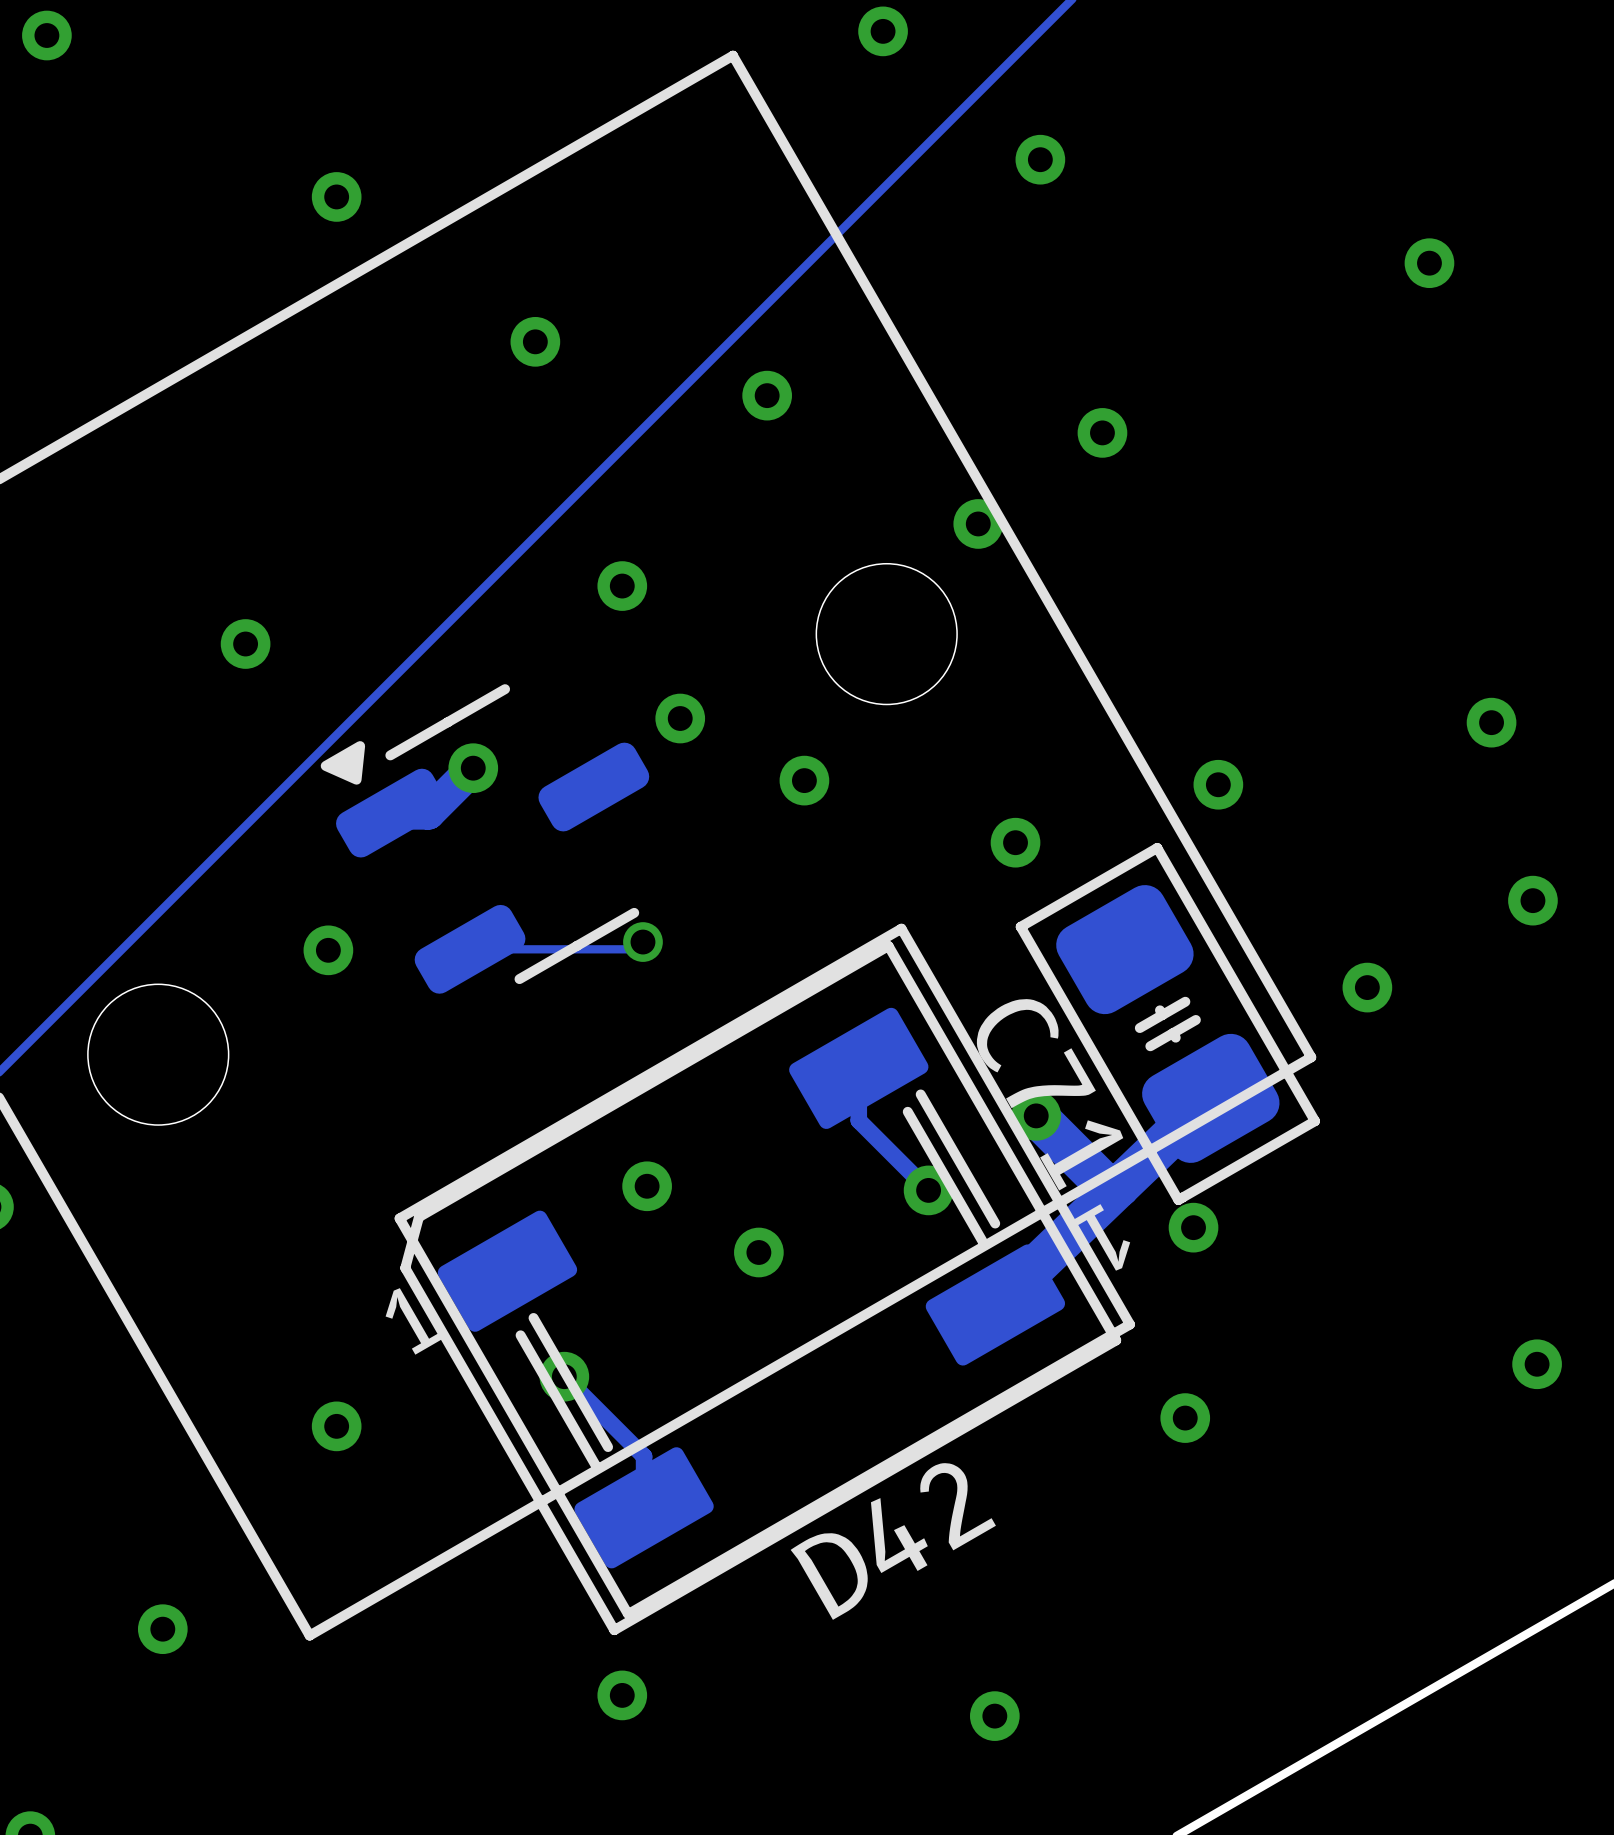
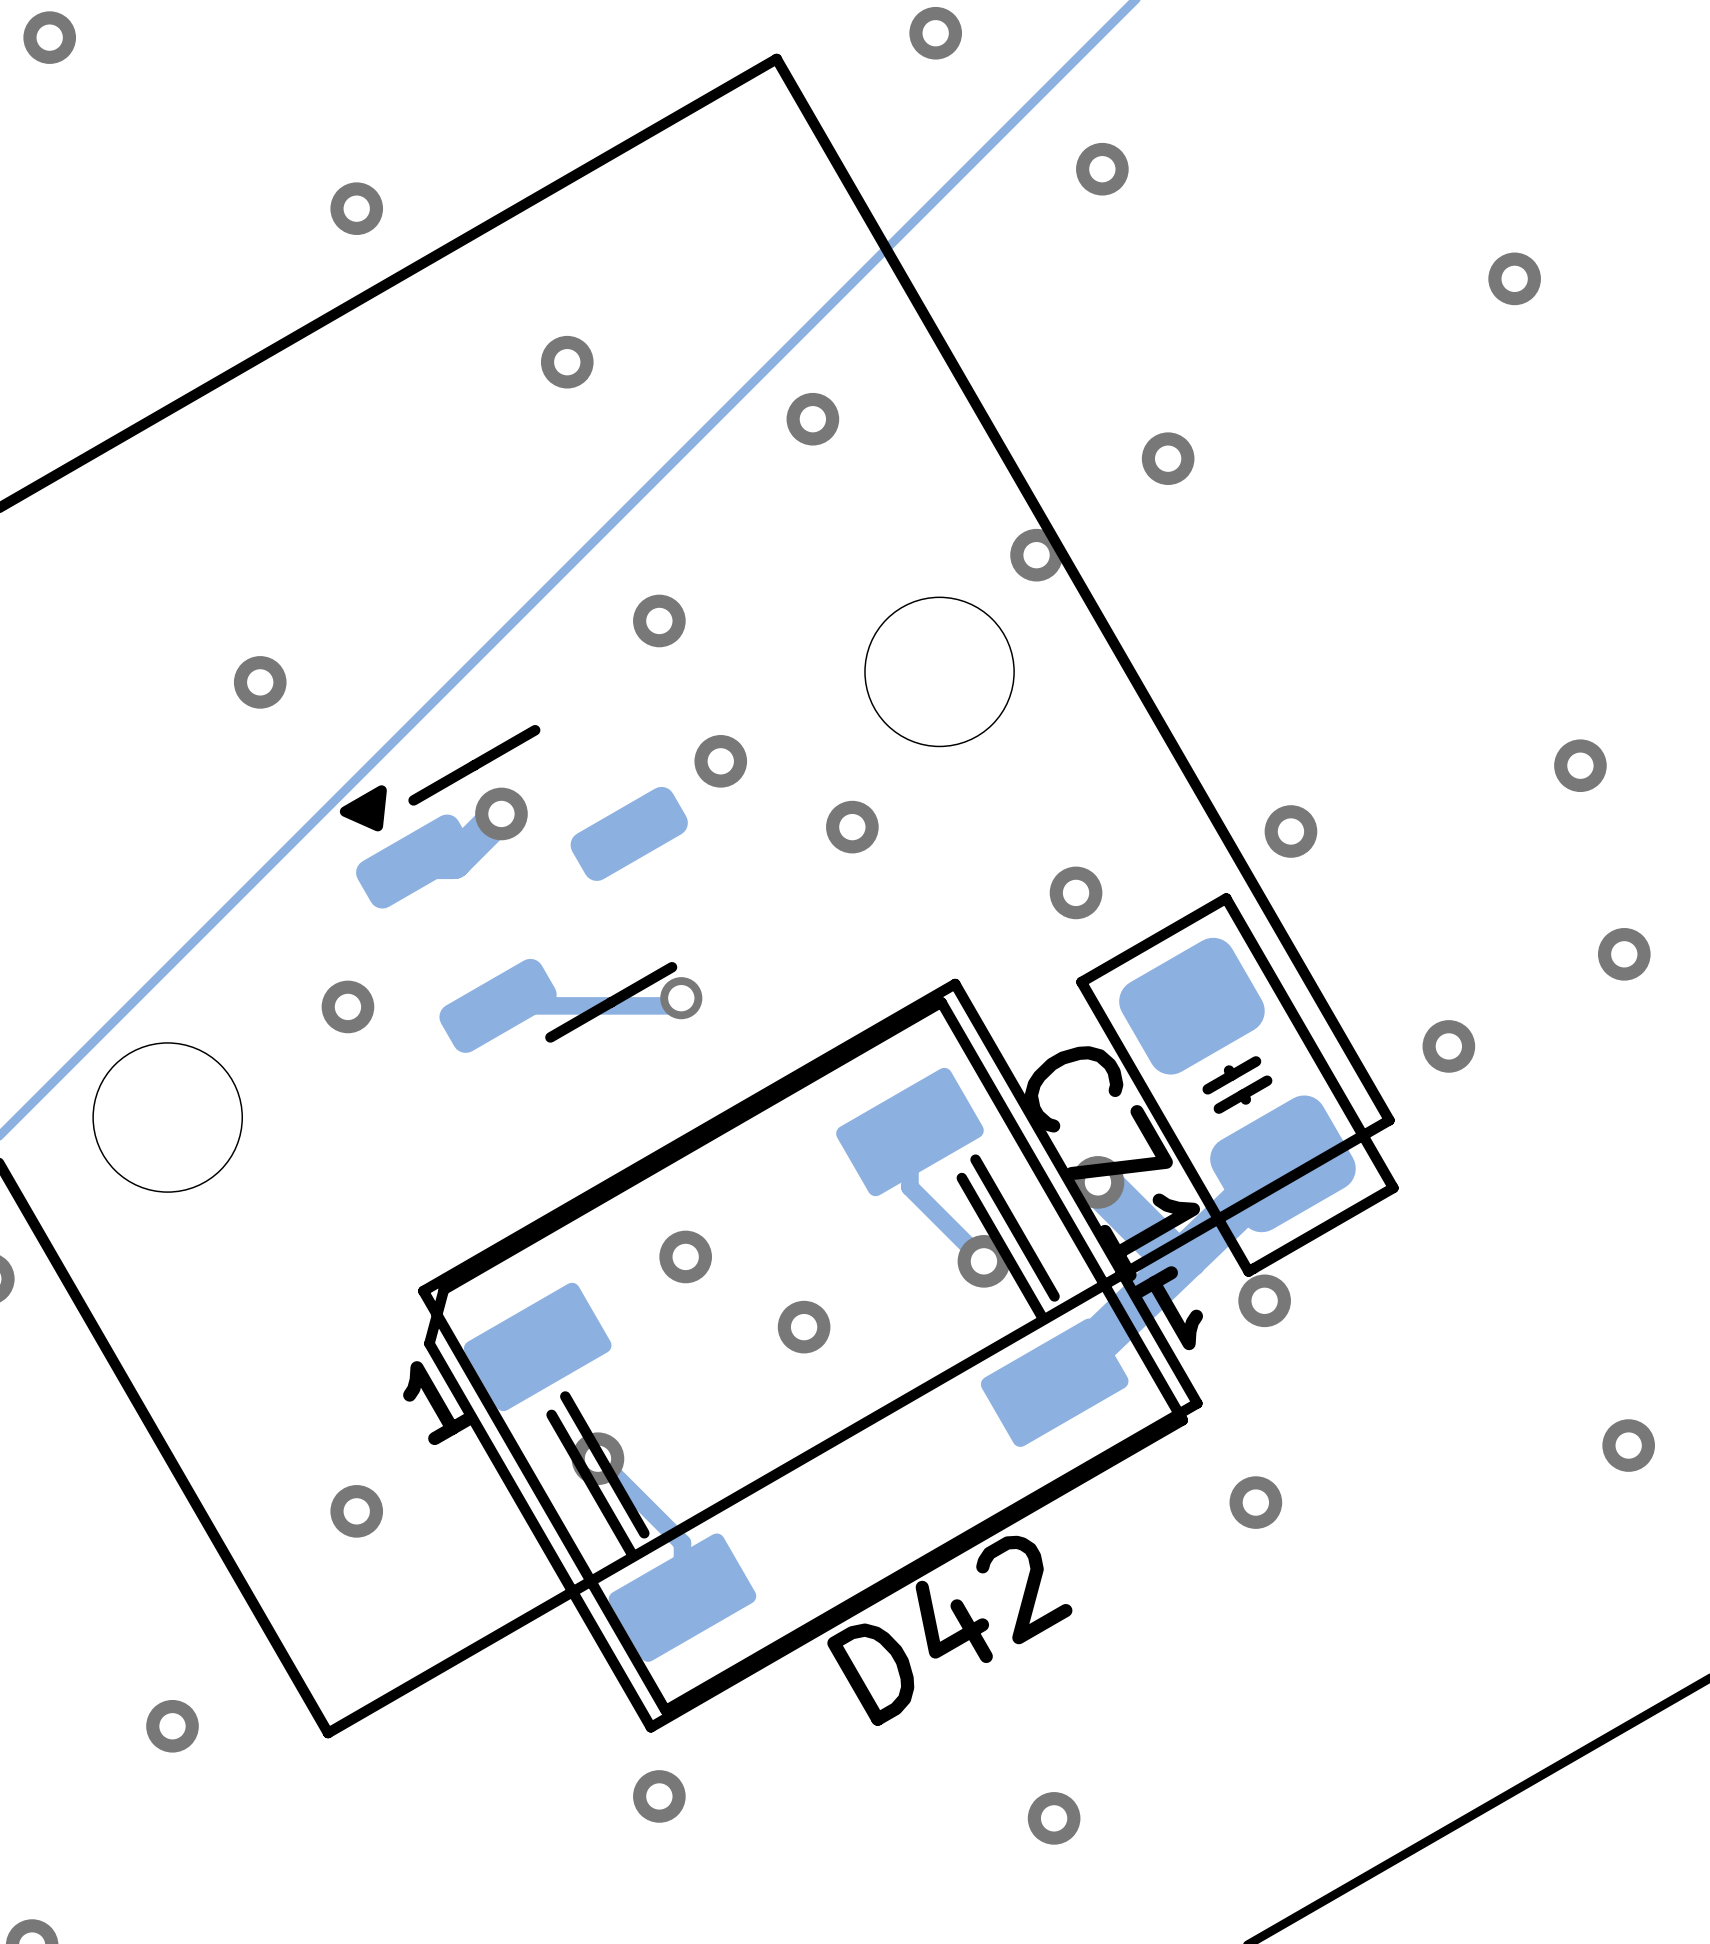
track width: thin (642, 942) (635, 949) (470, 949) -> thick (681, 998) (673, 1005) (498, 1005)

